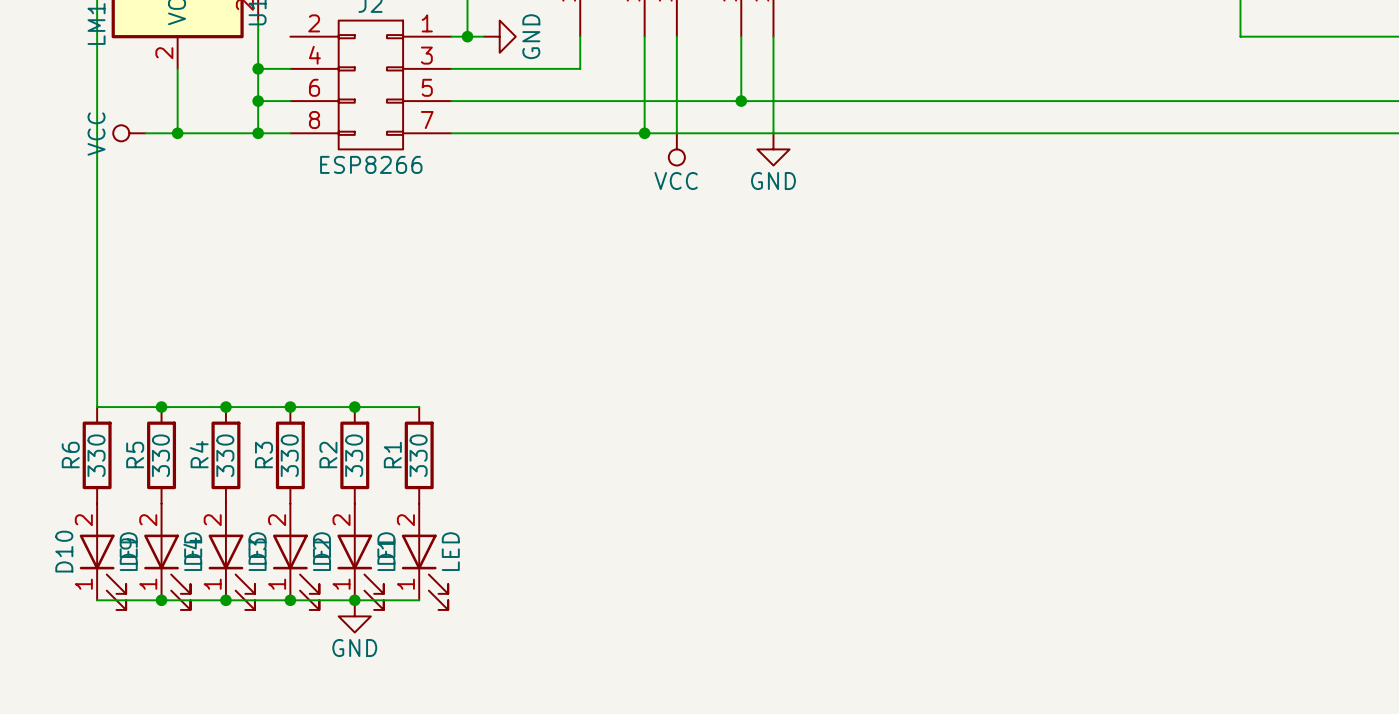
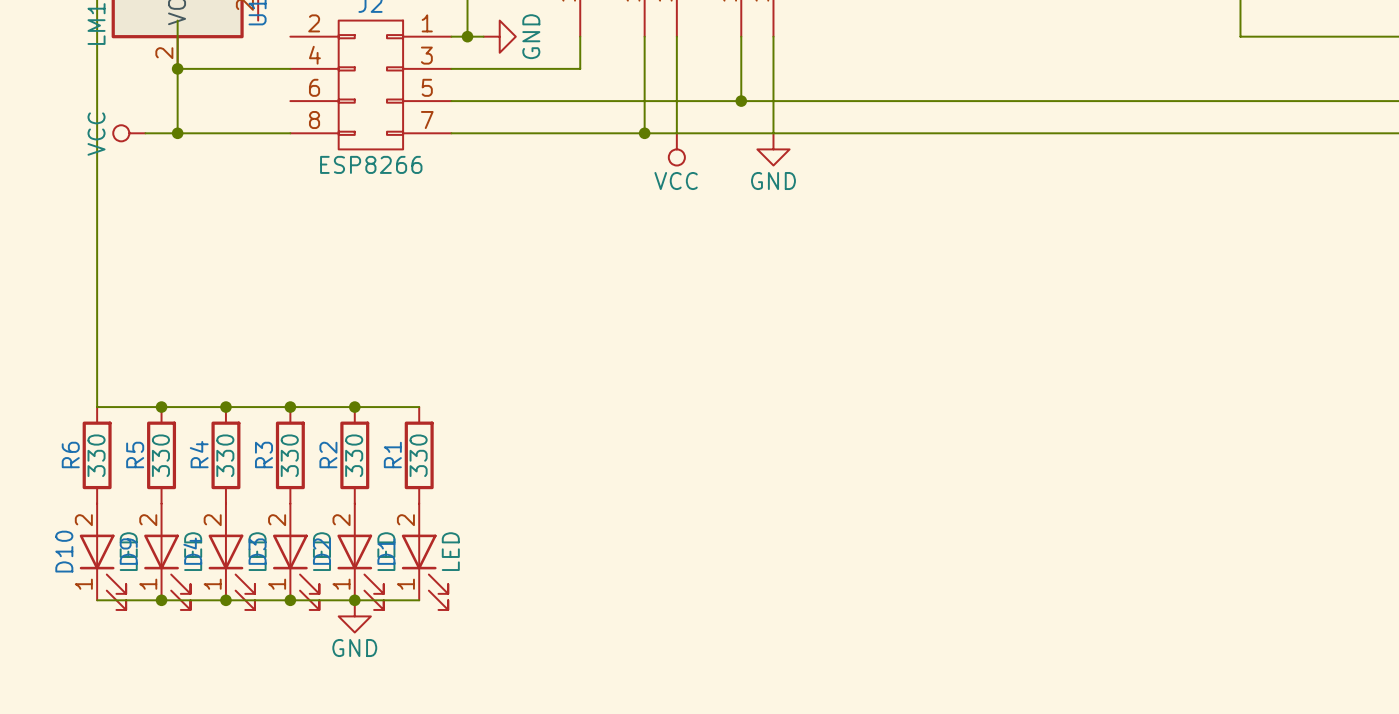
wire: none -> (177, 20) (177, 68) (258, 68)
wire: (258, 20) (258, 133) -> none
junction: none -> (177, 68)
junction: (258, 68) -> none
wire: (258, 101) (290, 101) -> none
junction: (258, 101) -> none
junction: (258, 133) -> none

